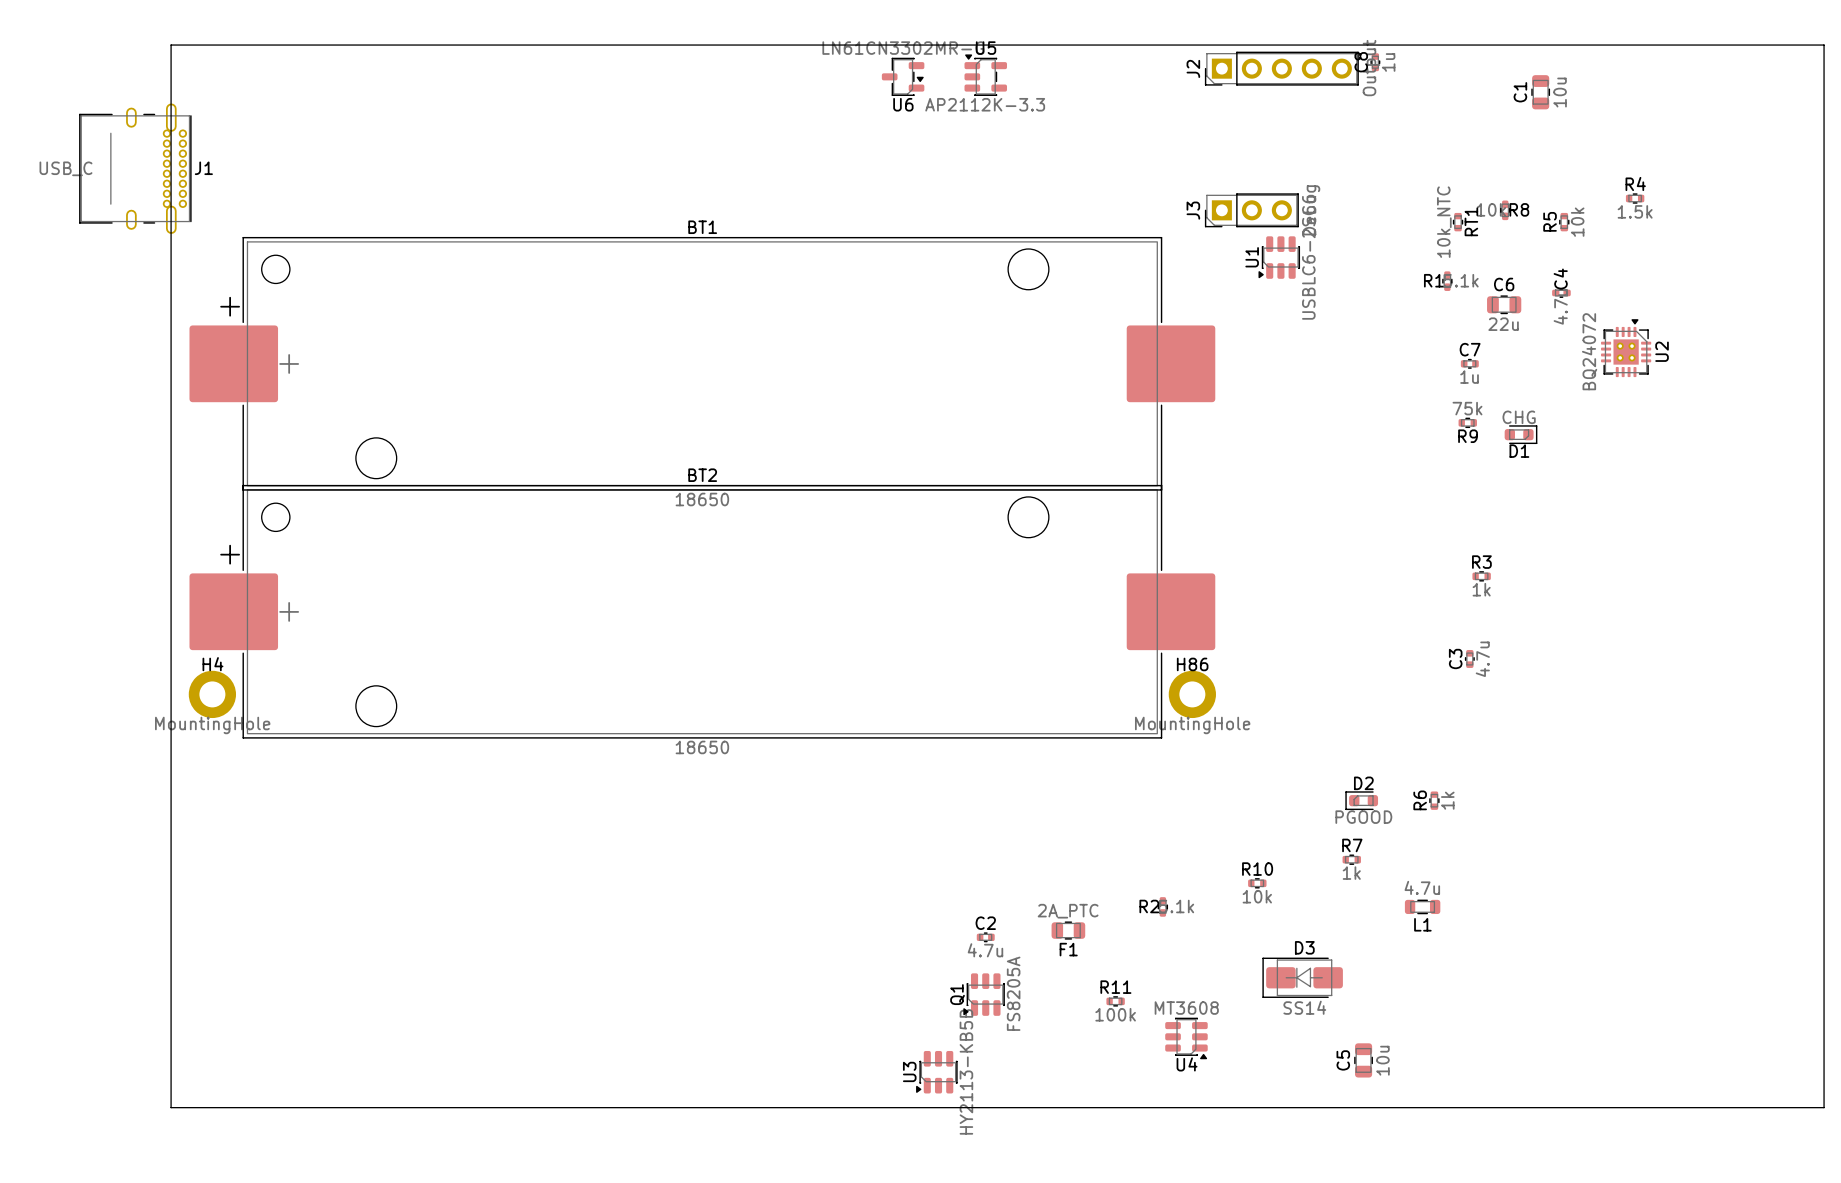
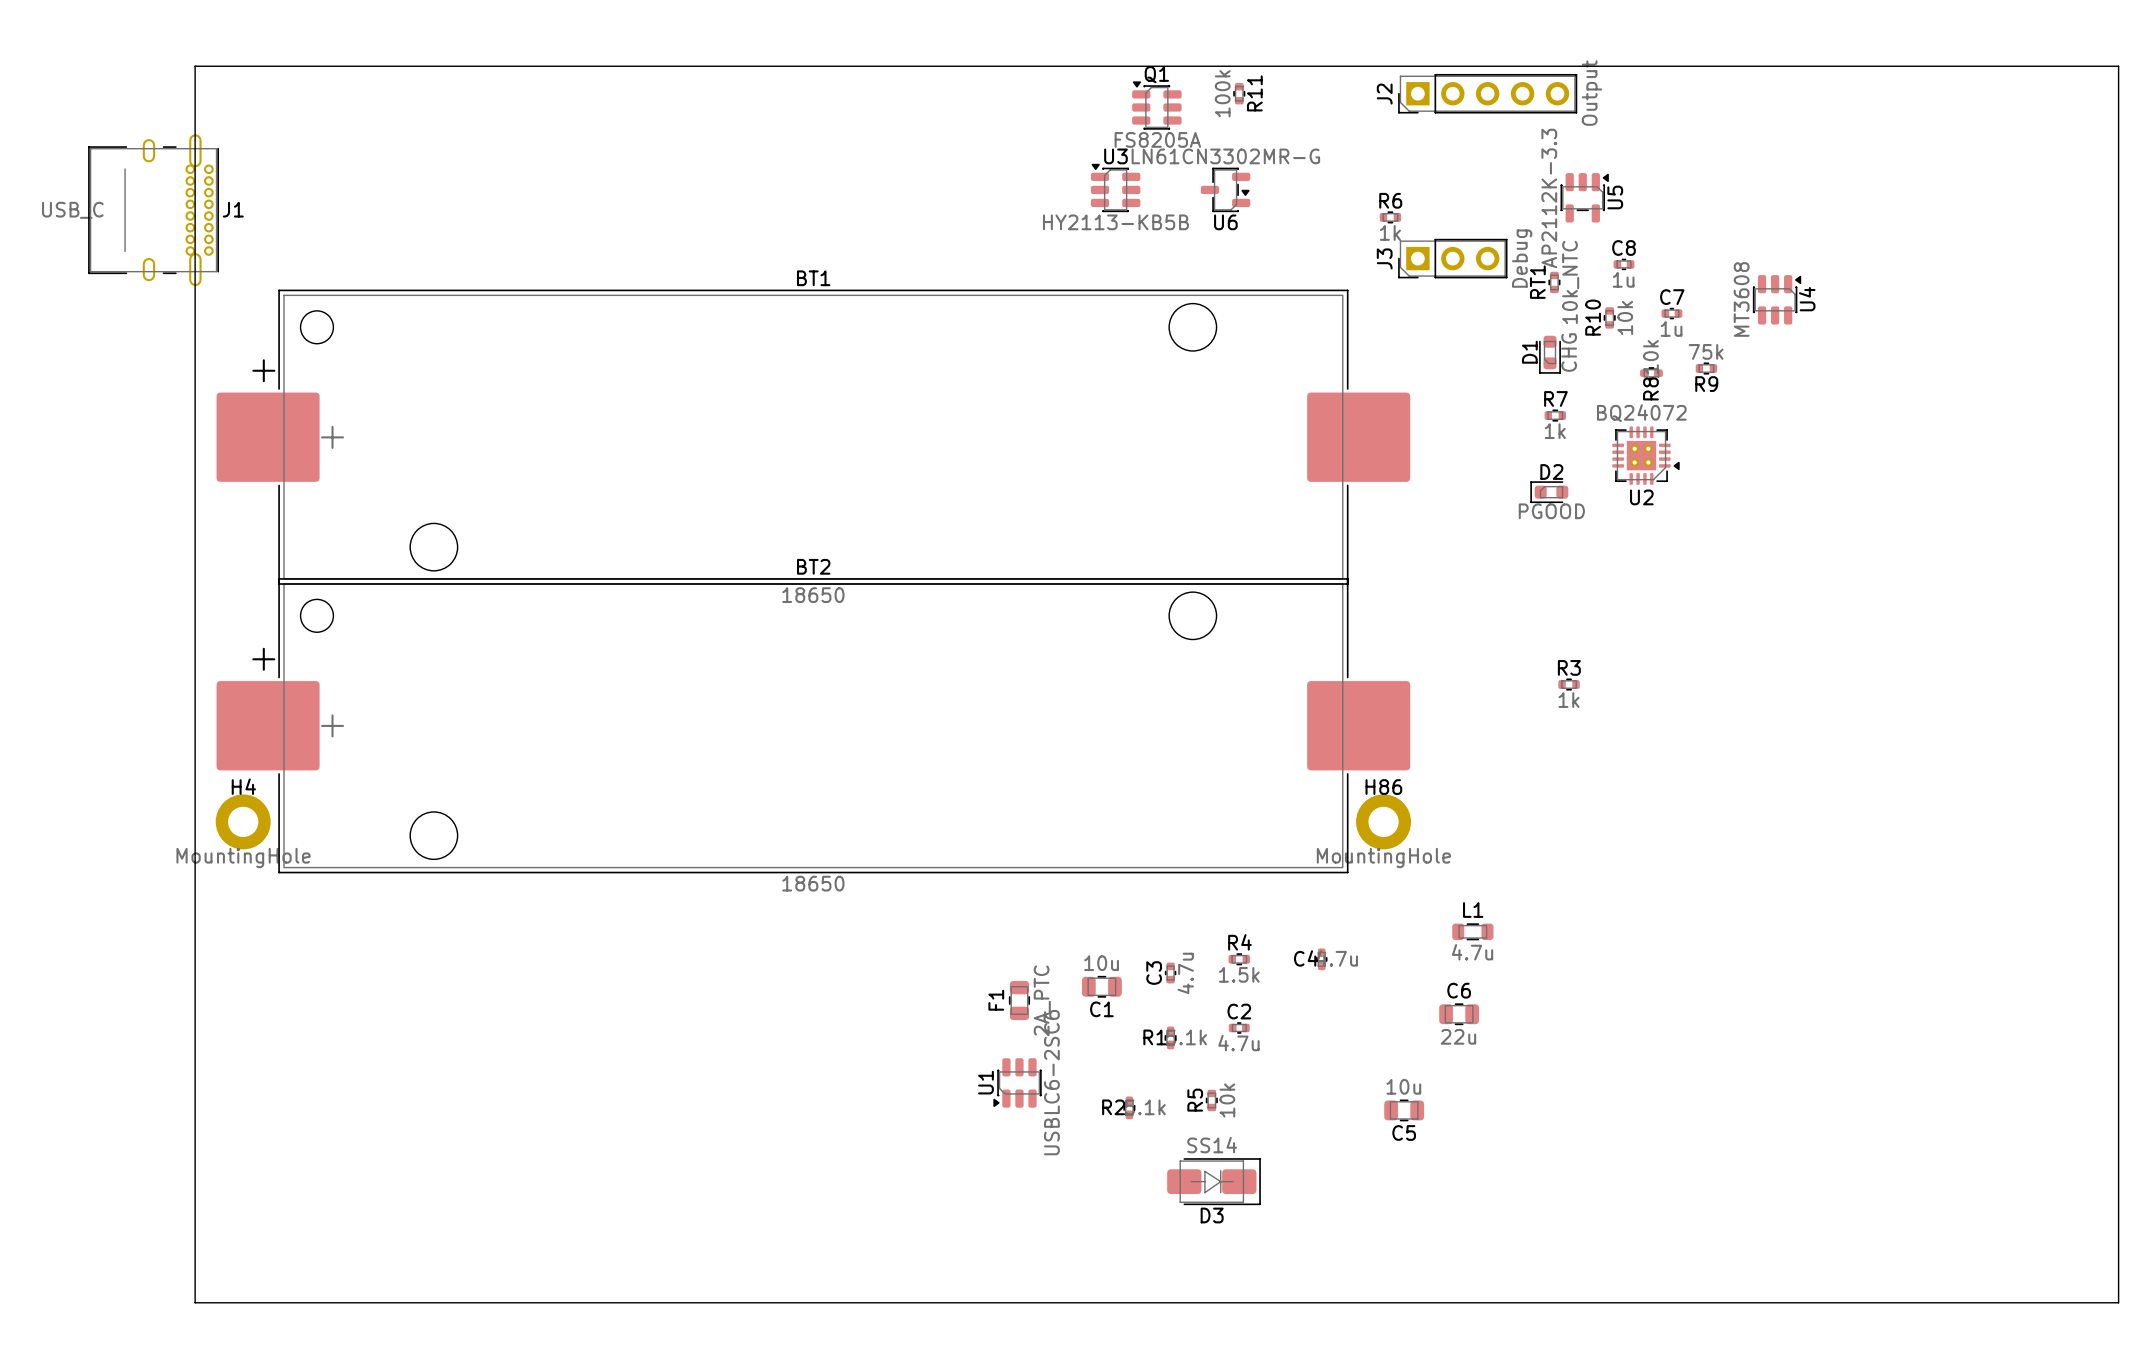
C8 rotation: 0° (1375, 62) -> 90° clockwise (1623, 264)
C8 position: (1375, 62) -> (1623, 264)
U5 rotation: 0° (985, 75) -> 90° clockwise (1584, 197)
U5 position: (985, 75) -> (1584, 197)
U6 position: (903, 76) -> (1225, 189)
C1 name position: C1 (1520, 92) -> C1 (1101, 1009)
C1 rotation: 0° (1540, 92) -> 90° clockwise (1101, 986)
C1 position: (1540, 92) -> (1101, 986)
C1 value position: 10u (1560, 92) -> 10u (1101, 963)
R4 position: (1635, 198) -> (1239, 959)
R8 rotation: 0° (1505, 210) -> 90° clockwise (1651, 373)
R8 position: (1505, 210) -> (1651, 373)
RT1 name position: RT1 (1471, 221) -> RT1 (1537, 282)
RT1 value position: 10k_NTC (1444, 222) -> 10k_NTC (1570, 282)
RT1 position: (1458, 222) -> (1554, 282)
R5 position: (1564, 222) -> (1211, 1100)
U1 position: (1279, 257) -> (1017, 1082)
R1 position: (1447, 281) -> (1170, 1037)
C4 rotation: 0° (1561, 292) -> 90° clockwise (1321, 959)
C4 position: (1561, 292) -> (1321, 959)
C6 position: (1504, 304) -> (1459, 1014)
U2 rotation: 0° (1626, 348) -> 90° clockwise (1646, 455)
U2 position: (1626, 348) -> (1646, 455)
C7 position: (1469, 363) -> (1671, 313)
R9 position: (1467, 422) -> (1706, 368)
D1 rotation: 0° (1521, 434) -> 90° clockwise (1550, 354)
D1 position: (1521, 434) -> (1550, 354)
R3 position: (1481, 576) -> (1569, 684)
C3 position: (1469, 658) -> (1170, 973)
D2 position: (1361, 800) -> (1549, 492)
R6 rotation: 0° (1434, 800) -> 90° clockwise (1390, 217)
R6 position: (1434, 800) -> (1390, 217)
R7 position: (1351, 859) -> (1555, 415)
R10 rotation: 0° (1257, 883) -> 90° clockwise (1609, 317)
R10 position: (1257, 883) -> (1609, 317)
L1 value position: 4.7u (1422, 887) -> 4.7u (1472, 952)
R2 position: (1162, 906) -> (1129, 1107)
L1 position: (1422, 906) -> (1472, 931)
L1 name position: L1 (1422, 924) -> L1 (1473, 910)
F1 rotation: 0° (1068, 930) -> 90° clockwise (1019, 1000)
F1 position: (1068, 930) -> (1019, 1000)
C2 position: (985, 937) -> (1239, 1027)
D3 rotation: 0° (1302, 977) -> 180° (1214, 1181)
D3 position: (1302, 977) -> (1214, 1181)
Q1 rotation: 0° (984, 994) -> 90° clockwise (1156, 105)
Q1 position: (984, 994) -> (1156, 105)
R11 rotation: 0° (1115, 1001) -> 90° clockwise (1239, 93)
R11 position: (1115, 1001) -> (1239, 93)
U4 rotation: 0° (1186, 1038) -> 90° counterclockwise (1777, 299)
U4 position: (1186, 1038) -> (1777, 299)
C5 name position: C5 (1343, 1060) -> C5 (1404, 1132)
C5 rotation: 0° (1363, 1060) -> 90° clockwise (1404, 1110)
C5 position: (1363, 1060) -> (1404, 1110)
C5 value position: 10u (1382, 1060) -> 10u (1403, 1086)
U3 rotation: 0° (936, 1072) -> 90° clockwise (1115, 187)
U3 position: (936, 1072) -> (1115, 187)

